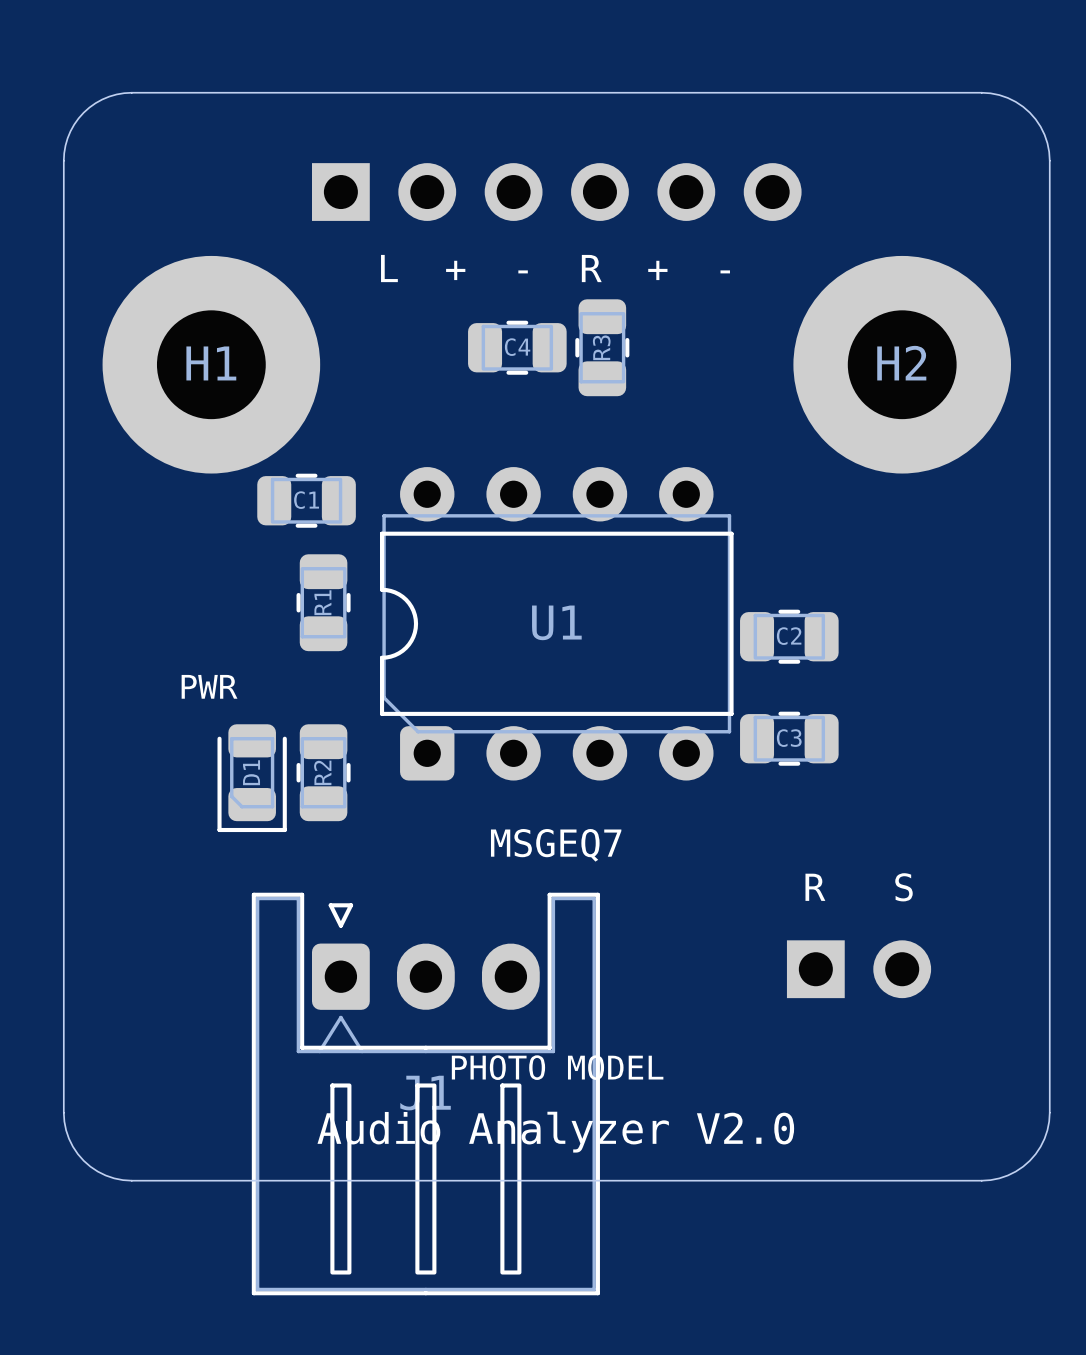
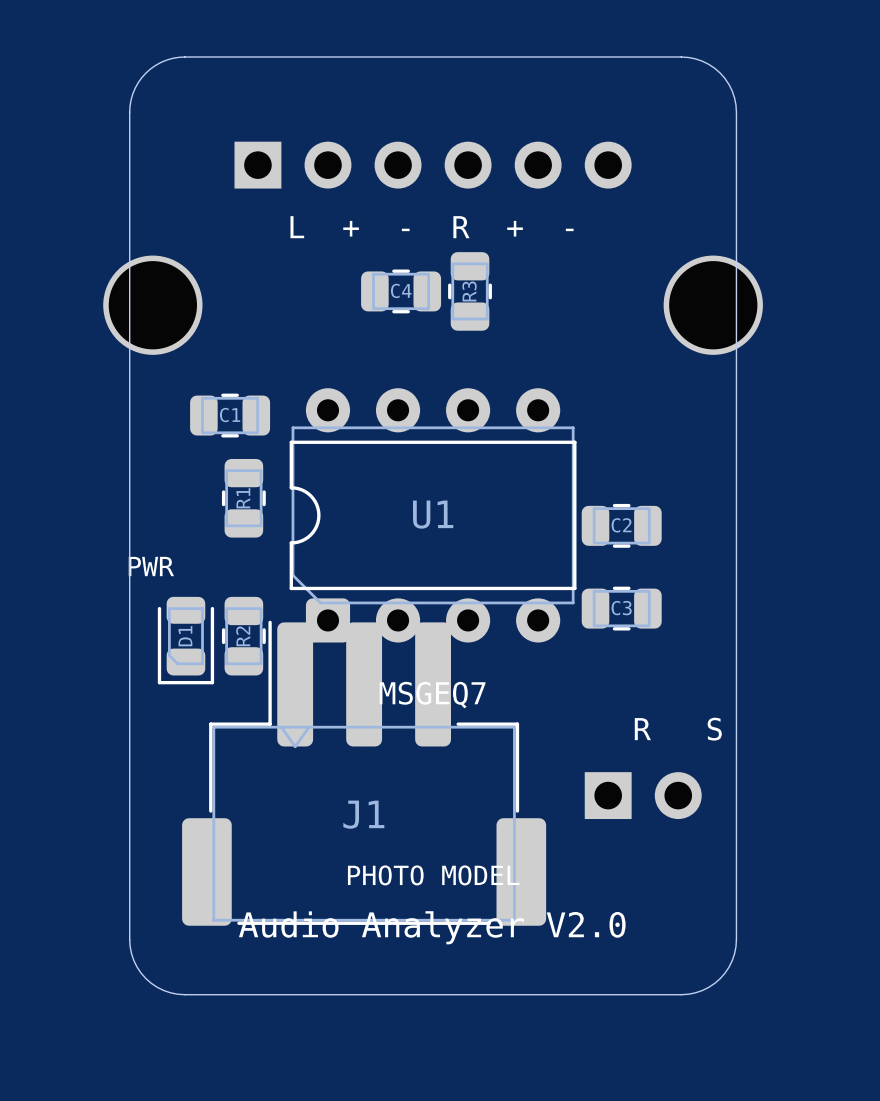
board edge: (131, 92) (981, 92) (1007, 97) (1023, 106) (1035, 119) (1044, 134) (1049, 160) (1049, 1112) (1047, 1130) (1040, 1146) (1023, 1166) (1007, 1175) (981, 1180) (131, 1180) (105, 1175) (90, 1166) (77, 1154) (66, 1130) (63, 1112) (63, 160) (65, 145) (70, 131) (83, 112) (102, 99) (116, 94) (131, 92) -> (184, 57) (166, 60) (145, 73) (132, 93) (129, 112) (129, 939) (131, 953) (137, 967) (145, 978) (157, 987) (170, 992) (184, 994) (681, 994) (695, 992) (708, 987) (720, 978) (729, 967) (734, 953) (736, 939) (736, 112) (734, 97) (729, 84) (720, 73) (708, 64) (695, 58) (681, 57) (184, 57)
H1: (211, 364) -> none
part: none -> (152, 305)
H2: (902, 364) -> none
part: none -> (713, 305)
J1 footprint: [251, 892, 600, 1296] -> [182, 620, 547, 926]
part position: (859, 969) -> (643, 795)

